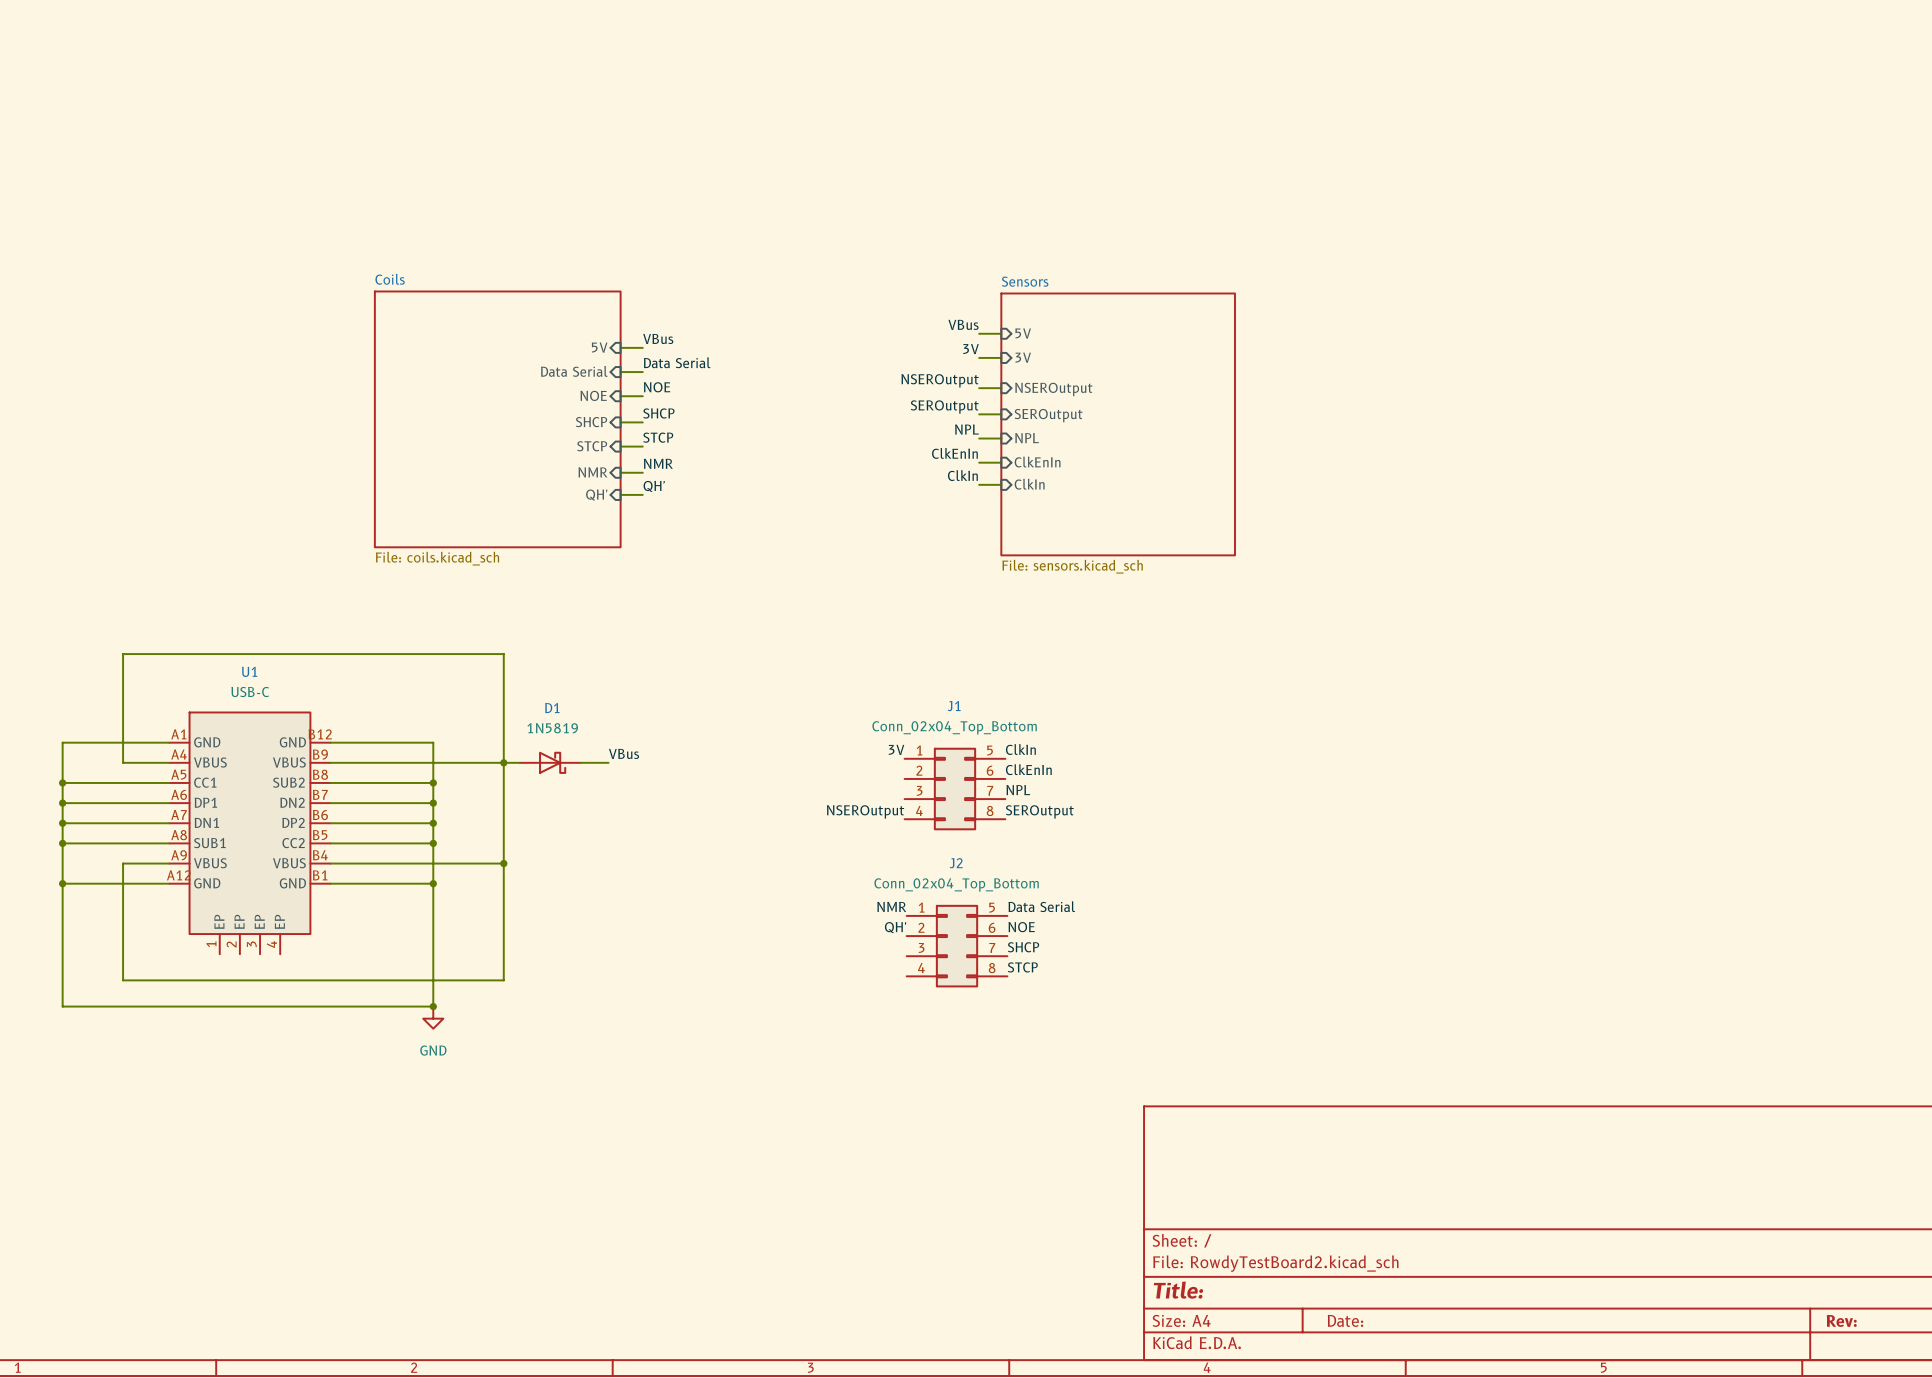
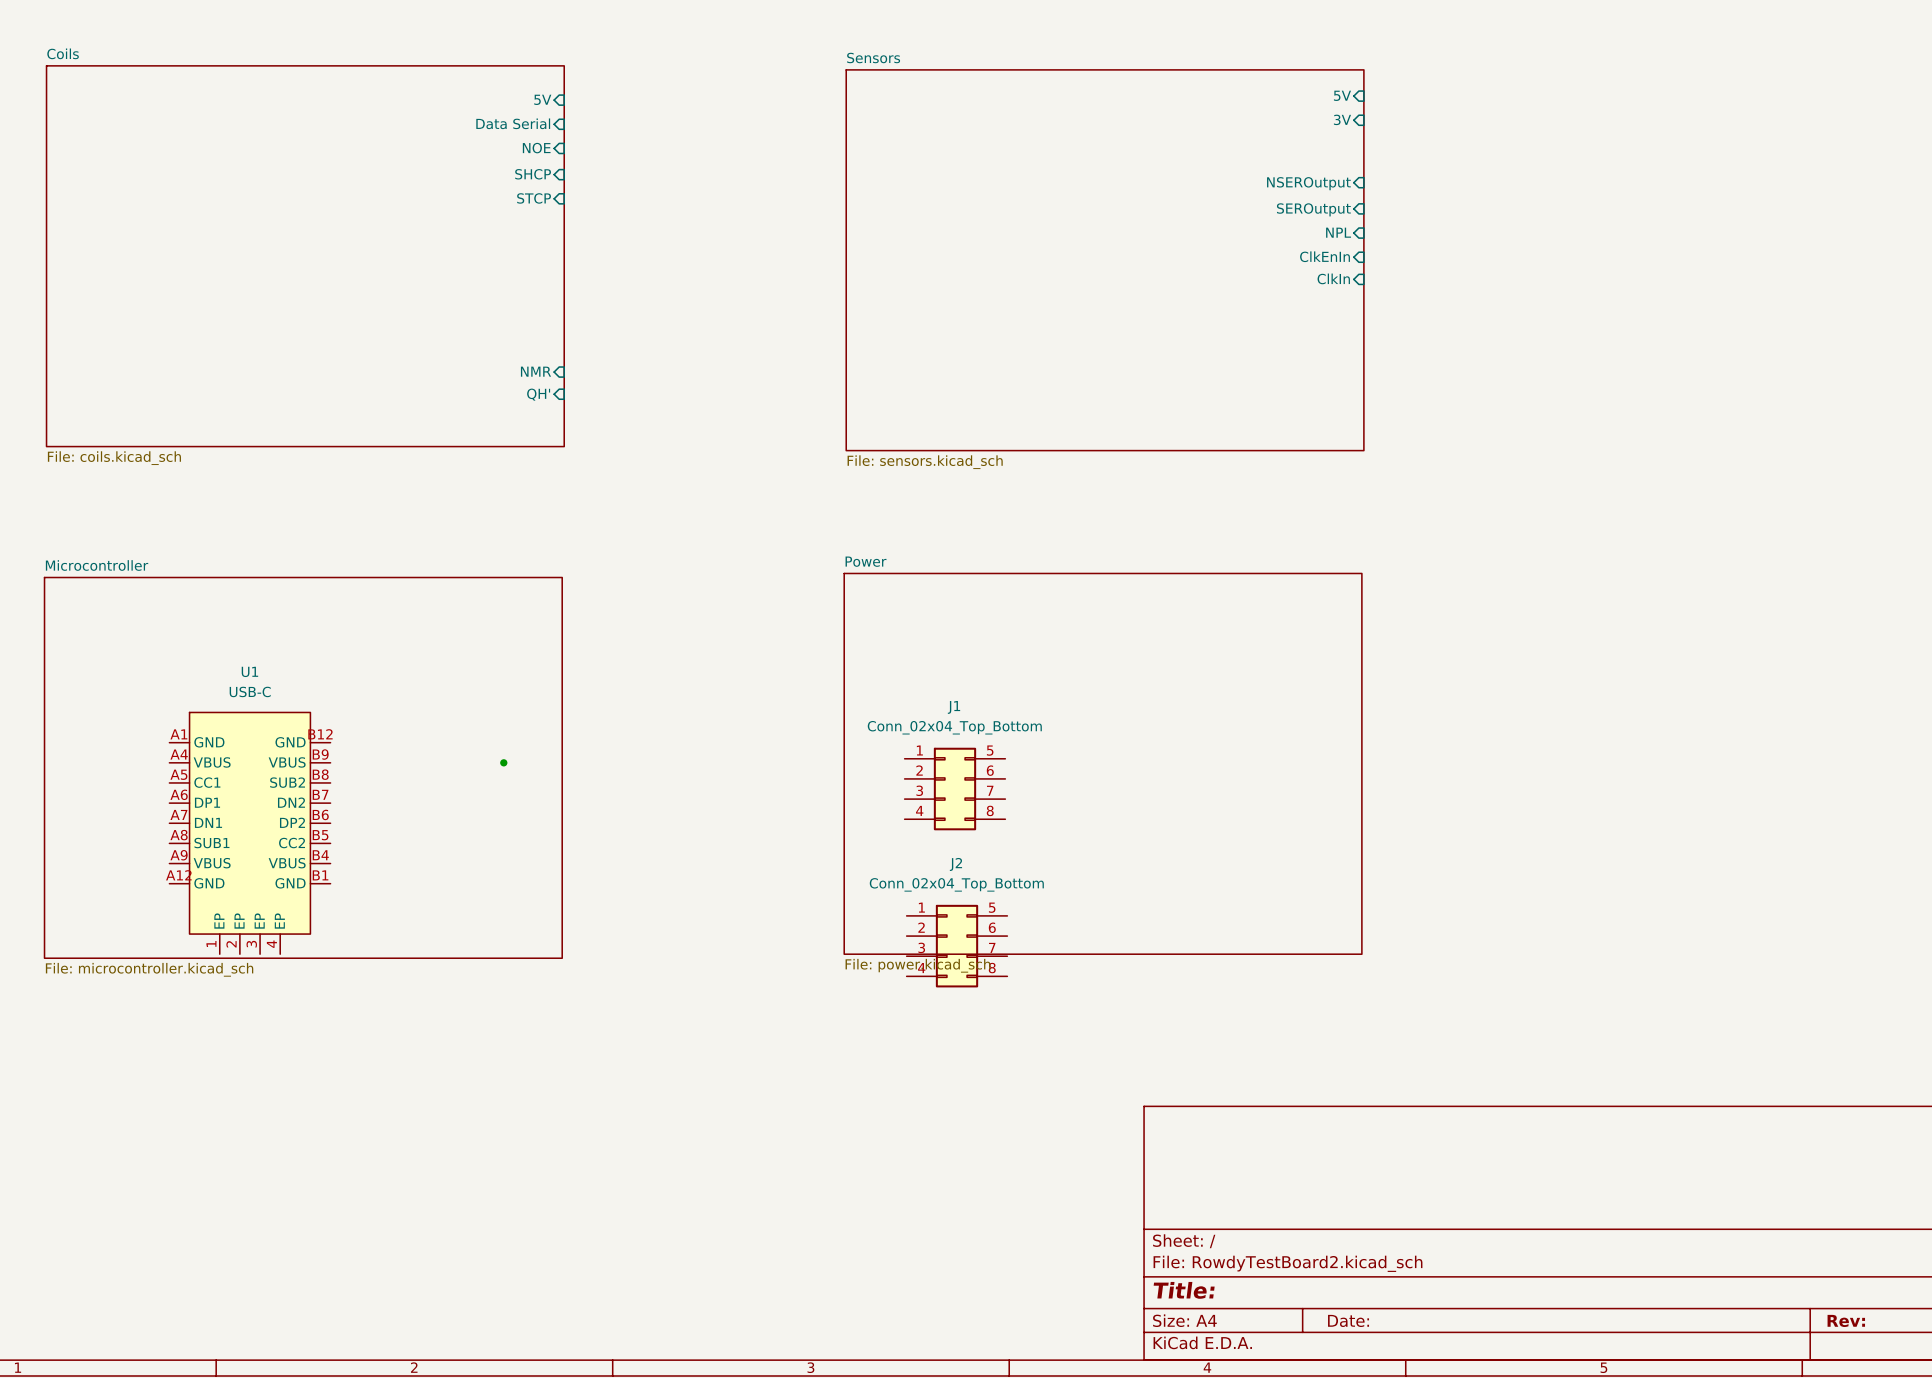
sheet pin: none -> 5V (1342, 95)
sheet pin: none -> 5V (542, 99)
sheet pin: none -> 3V (1342, 119)
sheet pin: none -> Data Serial (513, 123)
sheet pin: none -> NOE (536, 148)
sheet pin: none -> SHCP (533, 174)
sheet pin: none -> NSEROutput (1308, 183)
sheet pin: none -> STCP (534, 198)
sheet pin: none -> SEROutput (1313, 209)
sheet pin: none -> NPL (1338, 232)
sheet Coils: none -> File: coils.kicad_sch (305, 256)
sheet pin: none -> ClkEnIn (1325, 256)
sheet Sensors: none -> File: sensors.kicad_sch (1105, 260)
sheet pin: none -> ClkIn (1333, 278)
label: VBus (963, 324) -> none
wire: (979, 333) (1001, 333) -> none
sheet pin: 5V (1023, 333) -> none
label: VBus (658, 338) -> none
sheet pin: 5V (599, 347) -> none
wire: (620, 347) (642, 347) -> none
label: 3V (971, 349) -> none
wire: (979, 357) (1001, 357) -> none
sheet pin: 3V (1023, 357) -> none
label: Data Serial (677, 362) -> none
sheet pin: Data Serial (574, 371) -> none
wire: (620, 372) (642, 372) -> none
label: NSEROutput (940, 380) -> none
label: NOE (657, 387) -> none
wire: (979, 388) (1001, 388) -> none
sheet pin: NSEROutput (1053, 389) -> none
sheet pin: NOE (593, 395) -> none
wire: (620, 396) (642, 396) -> none
label: SEROutput (944, 407) -> none
label: SHCP (658, 413) -> none
wire: (979, 414) (1001, 414) -> none
sheet pin: SEROutput (1048, 415) -> none
sheet Coils: File: coils.kicad_sch (497, 419) -> none
sheet pin: SHCP (591, 422) -> none
wire: (620, 422) (642, 422) -> none
sheet Sensors: File: sensors.kicad_sch (1118, 424) -> none
label: NPL (966, 429) -> none
label: STCP (658, 437) -> none
wire: (979, 438) (1001, 438) -> none
sheet pin: NPL (1027, 438) -> none
sheet pin: STCP (592, 446) -> none
wire: (620, 446) (642, 446) -> none
label: ClkEnIn (954, 453) -> none
wire: (979, 462) (1001, 462) -> none
sheet pin: ClkEnIn (1037, 462) -> none
label: NMR (658, 463) -> none
sheet pin position: NMR (592, 472) -> NMR (535, 371)
wire: (620, 472) (642, 472) -> none
label: ClkIn (962, 475) -> none
wire: (979, 484) (1001, 484) -> none
sheet pin: ClkIn (1029, 484) -> none
label: QH' (654, 486) -> none
wire: (620, 494) (642, 494) -> none
sheet pin position: QH' (596, 495) -> QH' (538, 394)
wire: (169, 742) (62, 742) (62, 1006) (433, 1006) -> none
wire: (330, 742) (433, 742) (433, 1008) -> none
label: 3V (896, 749) -> none
label: ClkIn (1020, 749) -> none
label: VBus (624, 753) -> none
wire: (169, 762) (123, 762) (123, 654) (503, 654) (503, 980) (123, 980) (123, 863) (169, 863) -> none
wire: (330, 762) (519, 762) -> none
D1: 1N5819 (550, 762) -> none
wire: (580, 762) (608, 762) -> none
sheet Power: none -> File: power.kicad_sch (1103, 763)
sheet Microcontroller: none -> File: microcontroller.kicad_sch (303, 767)
label: ClkEnIn (1028, 769) -> none
wire: (62, 782) (169, 782) -> none
junction: (62, 782) -> none
wire: (330, 782) (433, 782) -> none
junction: (433, 782) -> none
label: NPL (1018, 790) -> none
wire: (62, 803) (169, 803) -> none
junction: (62, 803) -> none
wire: (330, 803) (433, 803) -> none
junction: (433, 803) -> none
label: NSEROutput (865, 811) -> none
label: SEROutput (1039, 811) -> none
wire: (62, 823) (169, 823) -> none
junction: (62, 823) -> none
wire: (330, 823) (433, 823) -> none
junction: (433, 823) -> none
wire: (62, 843) (169, 843) -> none
junction: (62, 843) -> none
wire: (330, 843) (433, 843) -> none
junction: (433, 843) -> none
wire: (330, 863) (503, 863) -> none
junction: (503, 863) -> none
wire: (62, 883) (169, 883) -> none
junction: (62, 883) -> none
wire: (330, 883) (433, 883) -> none
junction: (433, 883) -> none
label: NMR (891, 906) -> none
label: Data Serial (1041, 906) -> none
label: QH' (895, 927) -> none
label: NOE (1021, 927) -> none
label: SHCP (1023, 947) -> none
label: STCP (1022, 967) -> none
junction: (433, 1006) -> none
power symbol: GND (433, 1018) -> none

